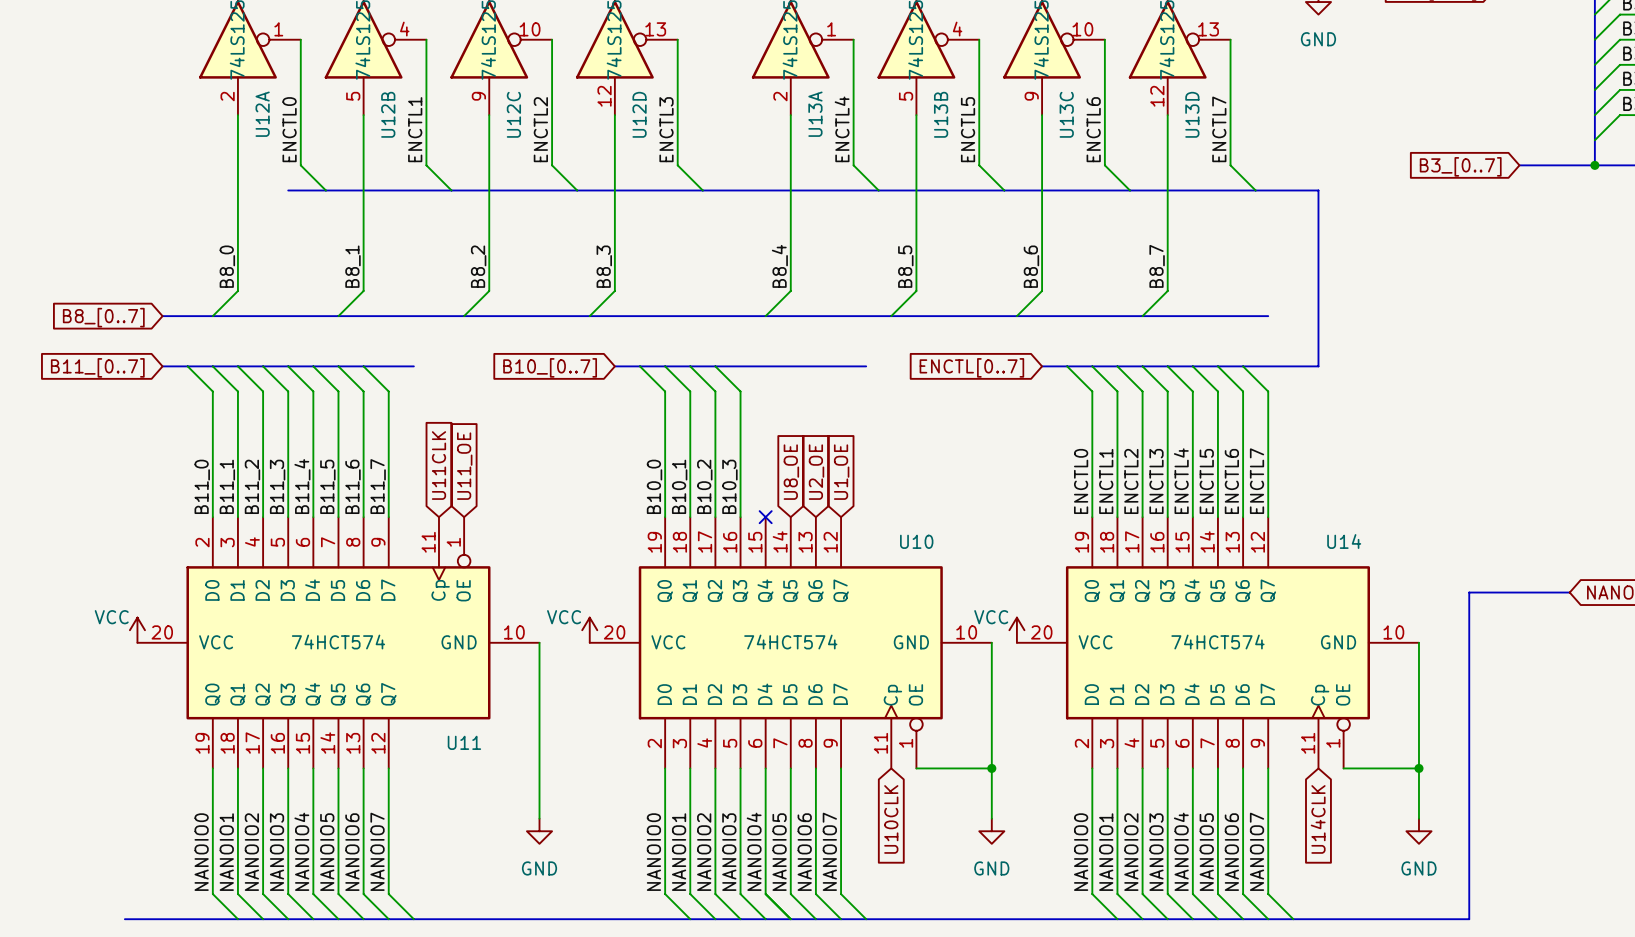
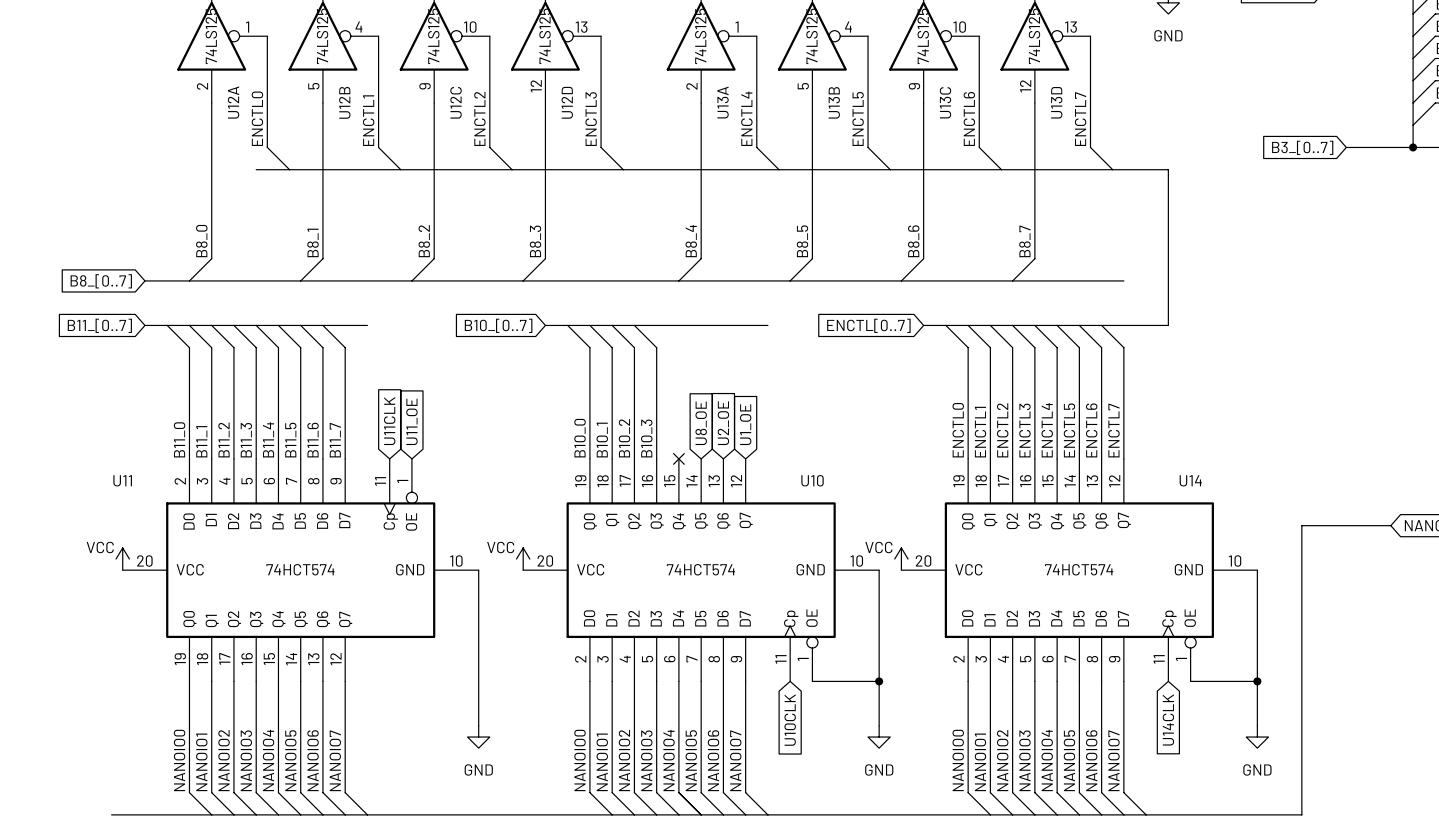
U11 name position: U11 (464, 742) -> U11 (122, 480)

